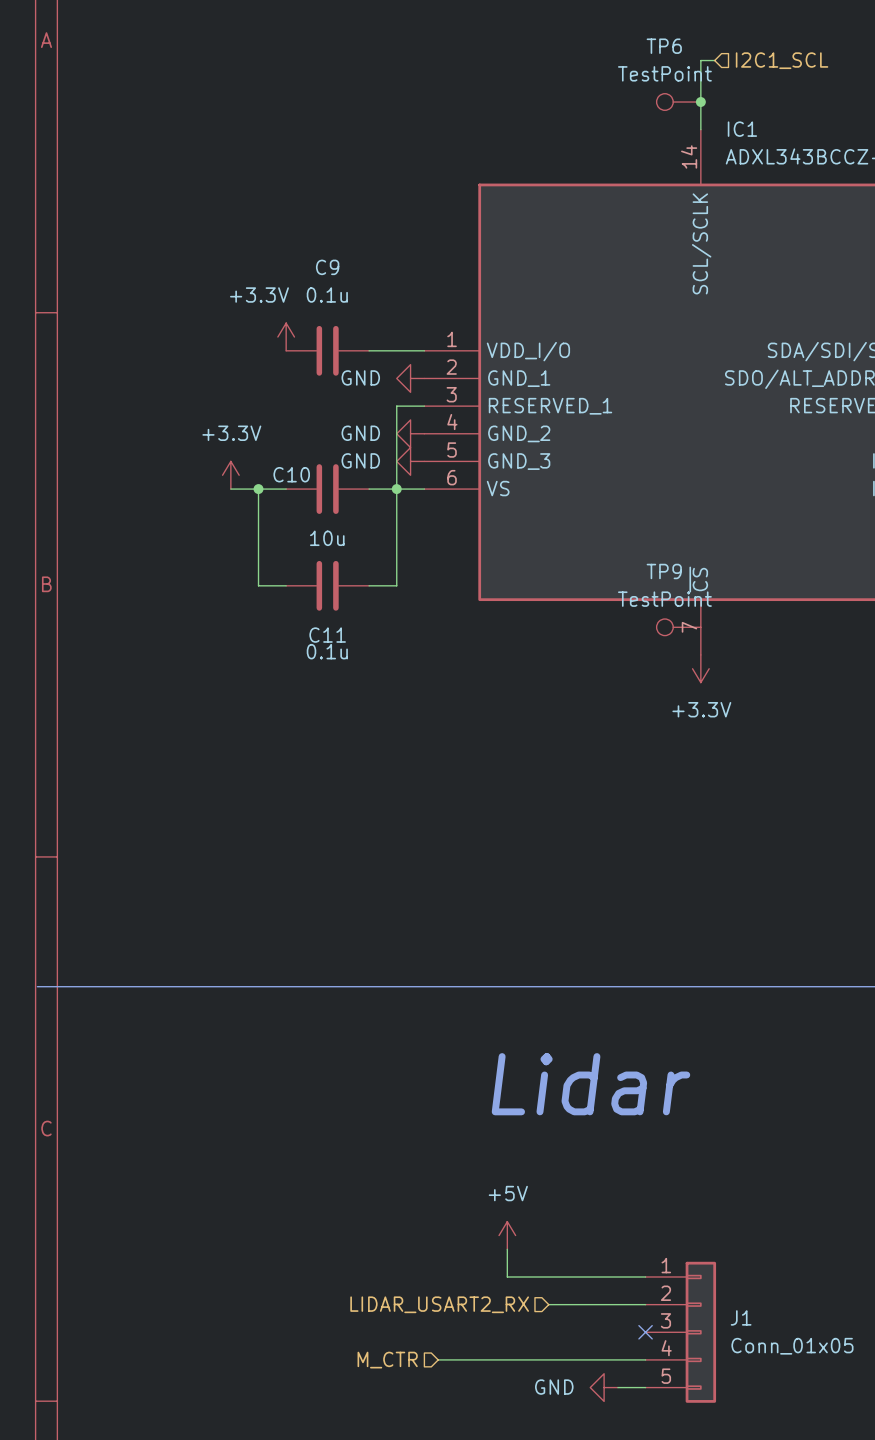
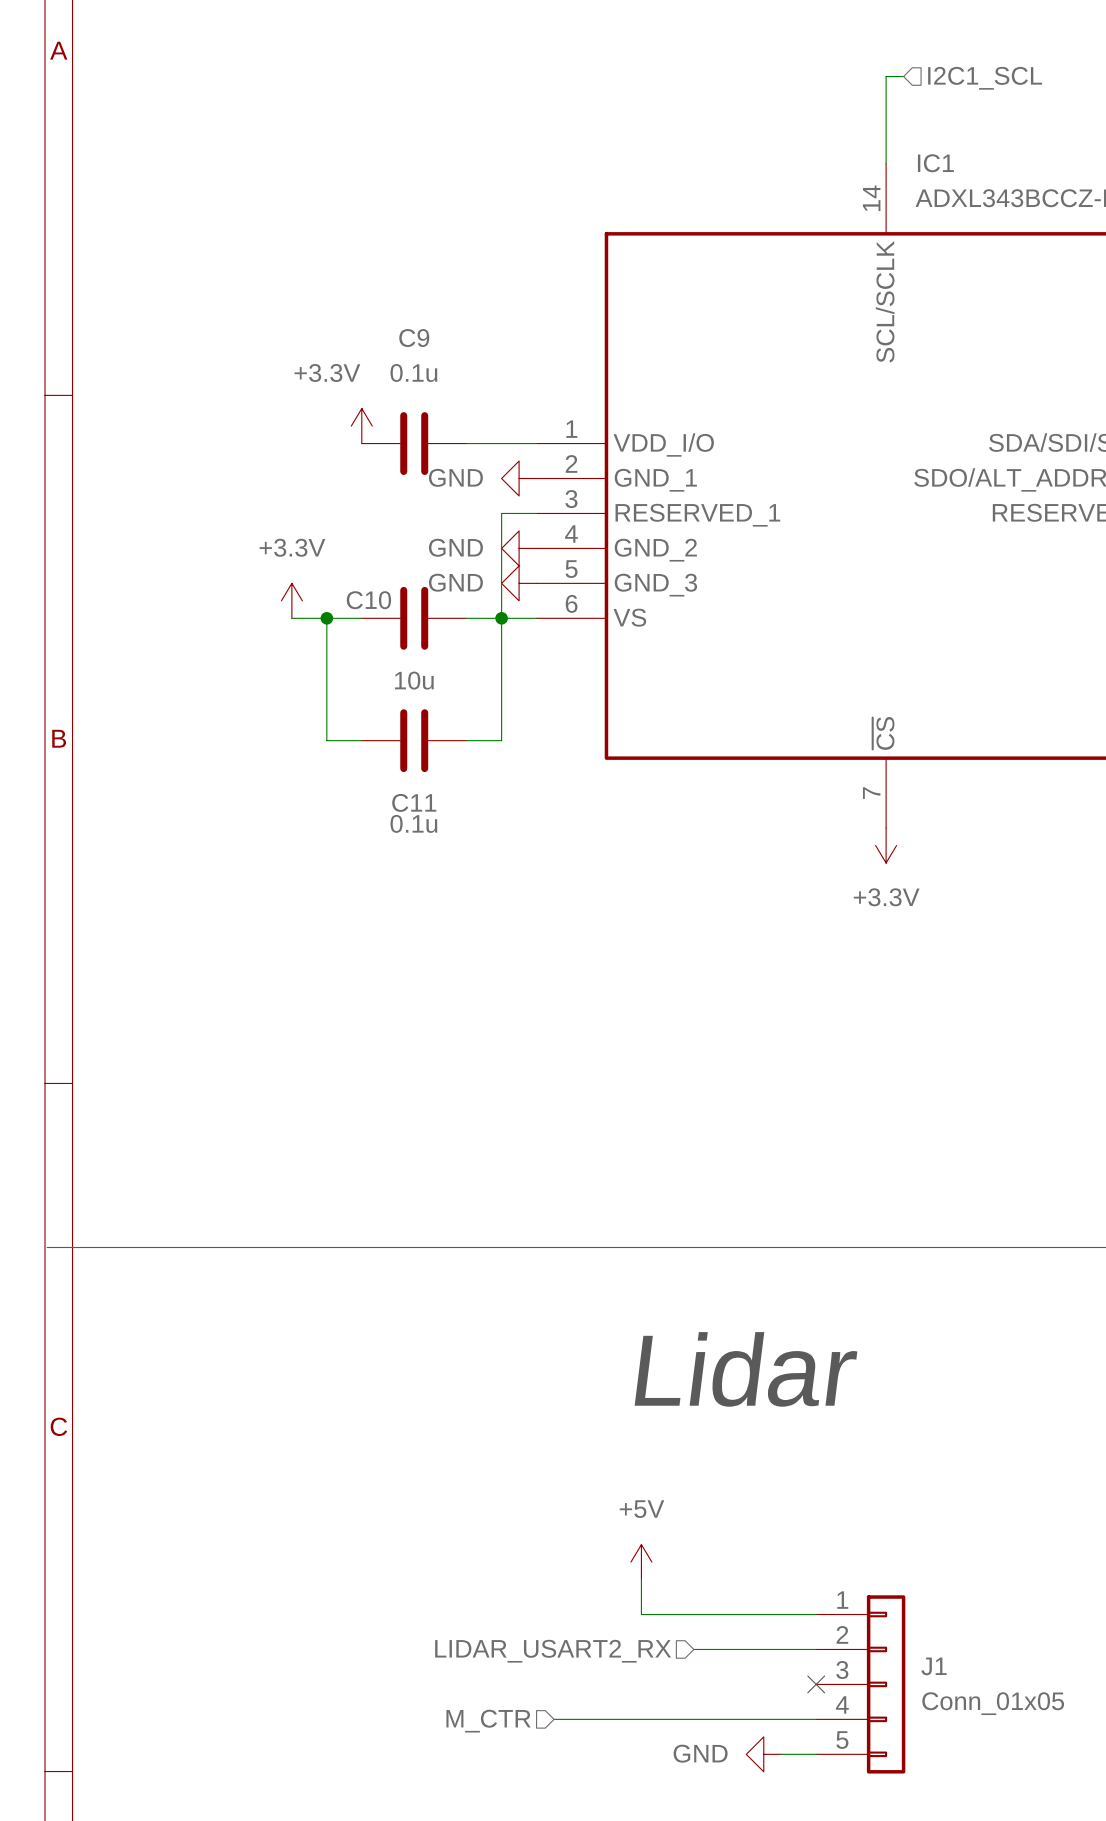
TP6: TestPoint (678, 102) -> none
junction: (700, 102) -> none
TP9: TestPoint (678, 627) -> none

